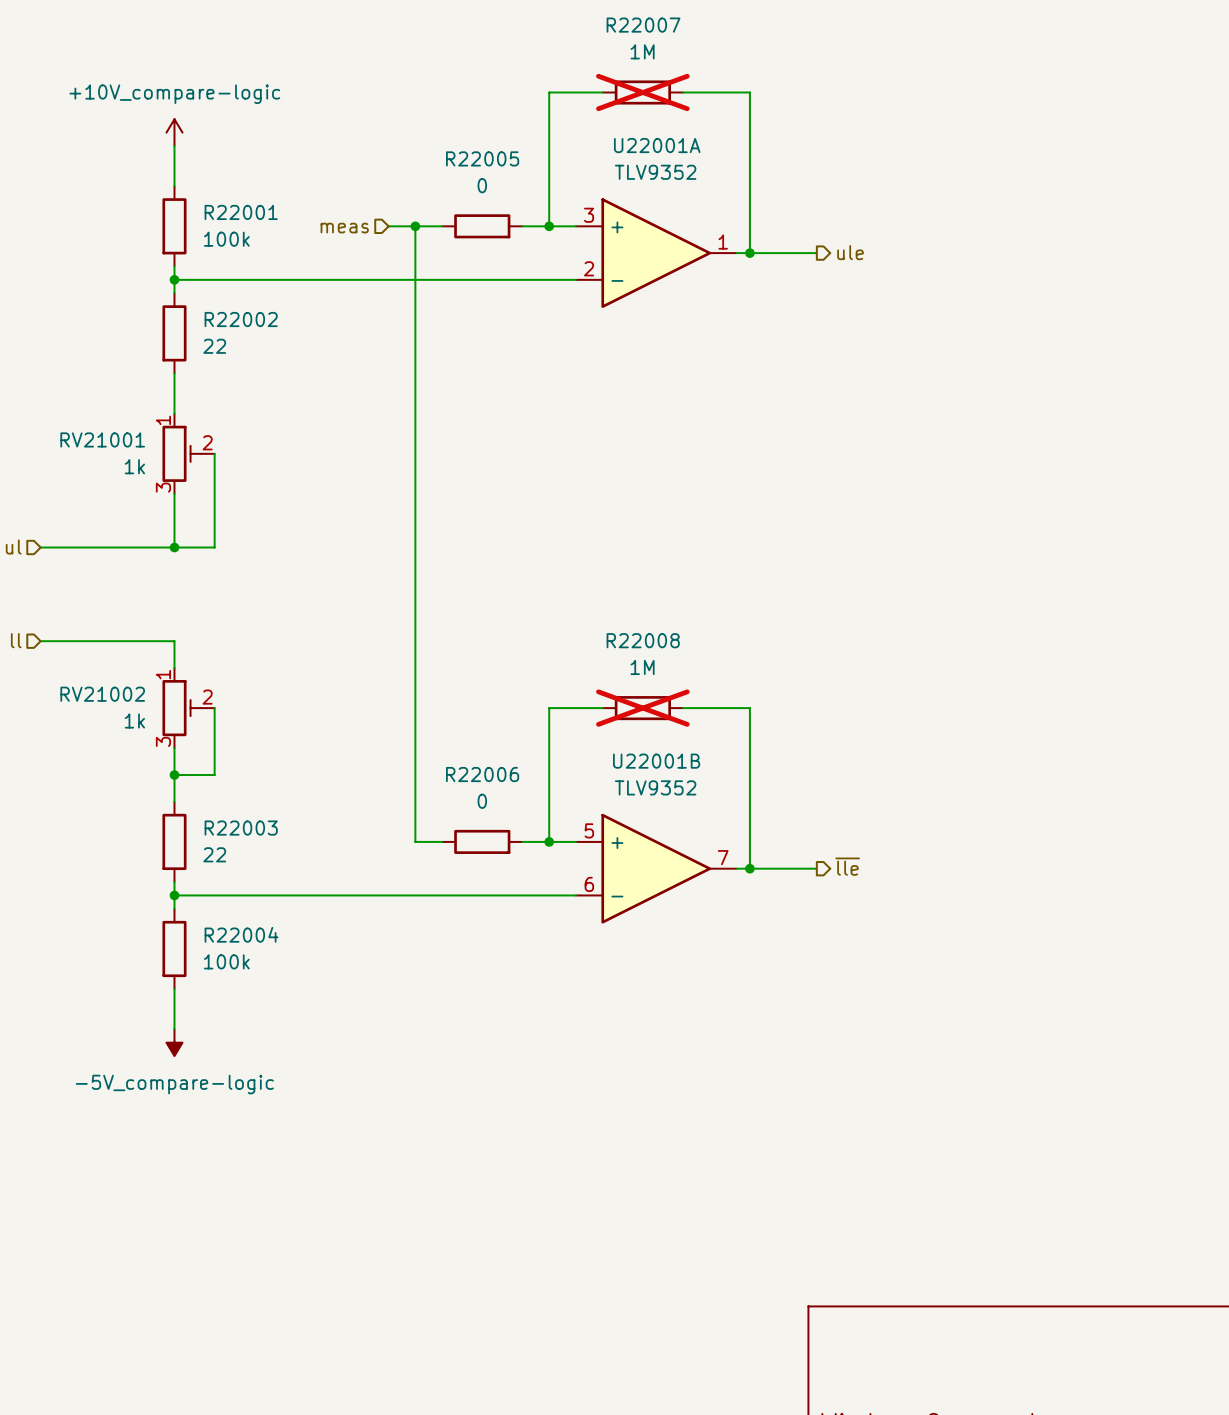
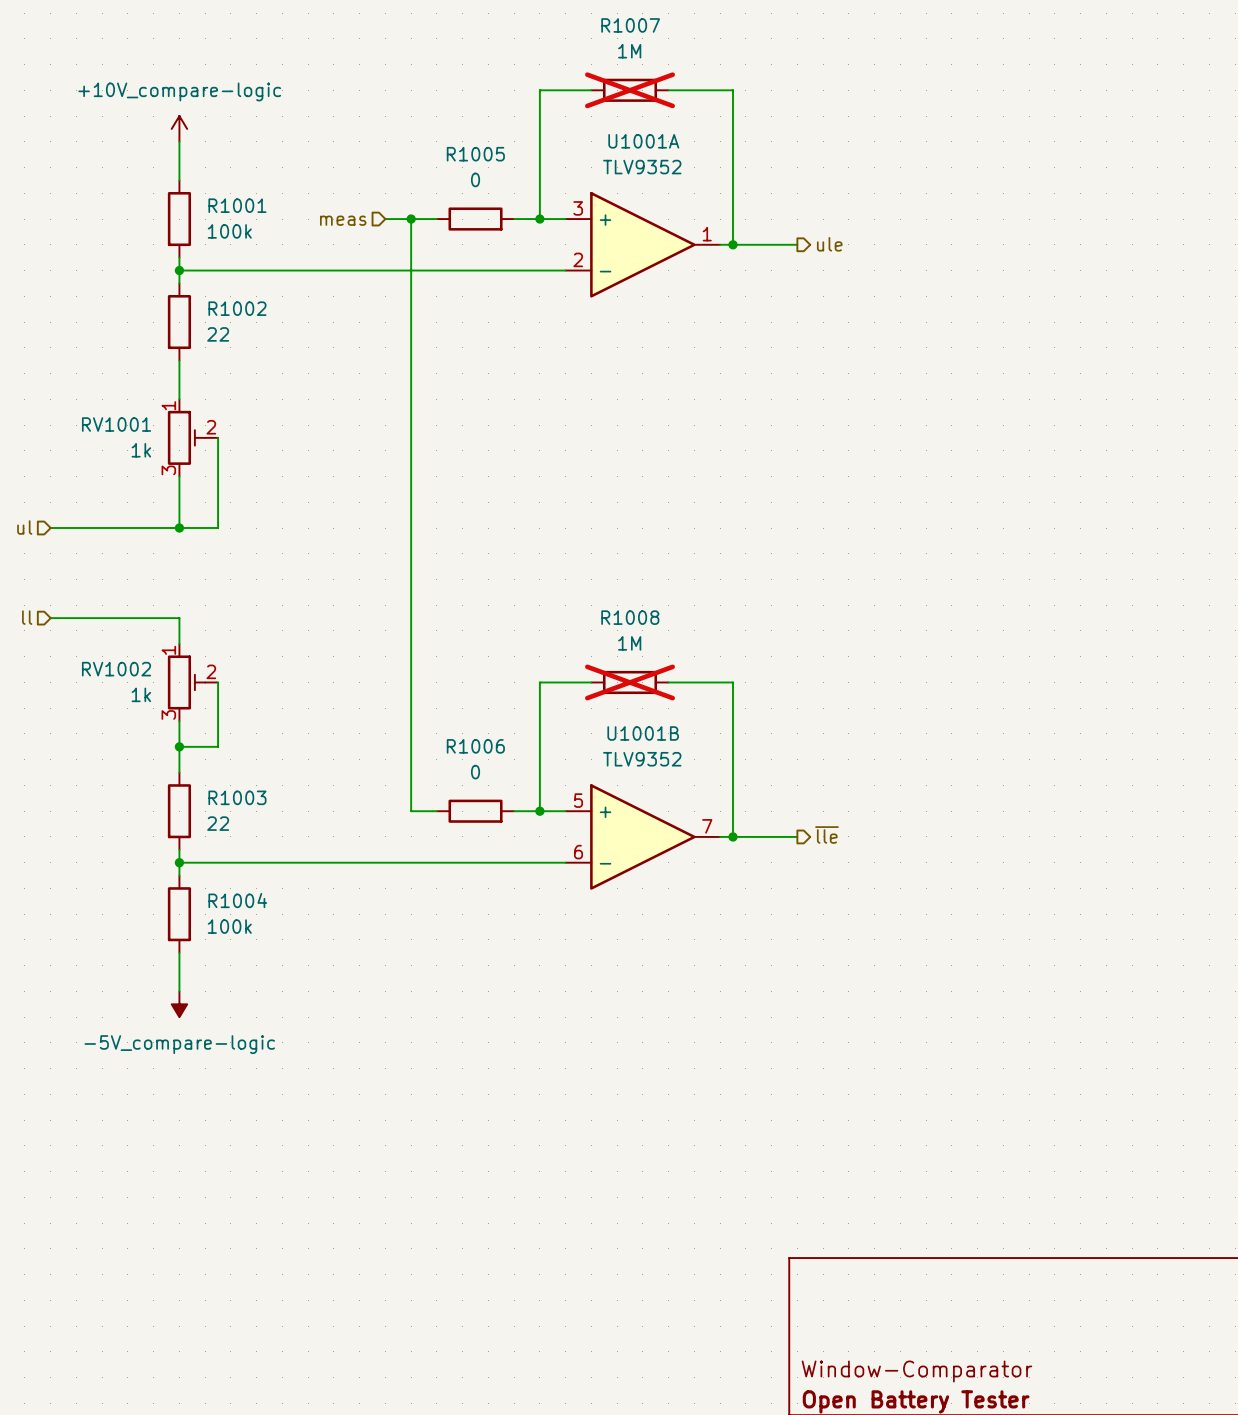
R22007 name: R22007 (643, 25) -> R1007 (630, 25)
U22001A name: U22001A (657, 145) -> U1001A (643, 141)
R22005 name: R22005 (482, 158) -> R1005 (475, 154)
R22001 name: R22001 (241, 212) -> R1001 (237, 205)
R22002 name: R22002 (241, 319) -> R1002 (237, 308)
RV21001 name: RV21001 (102, 439) -> RV1001 (116, 424)
R22008 name: R22008 (643, 640) -> R1008 (630, 617)
RV21002 name: RV21002 (102, 694) -> RV1002 (116, 669)
U22001B name: U22001B (656, 761) -> U1001B (643, 733)
R22006 name: R22006 (482, 774) -> R1006 (475, 746)
R22003 name: R22003 (241, 828) -> R1003 (237, 797)
R22004 name: R22004 (241, 934) -> R1004 (237, 900)

